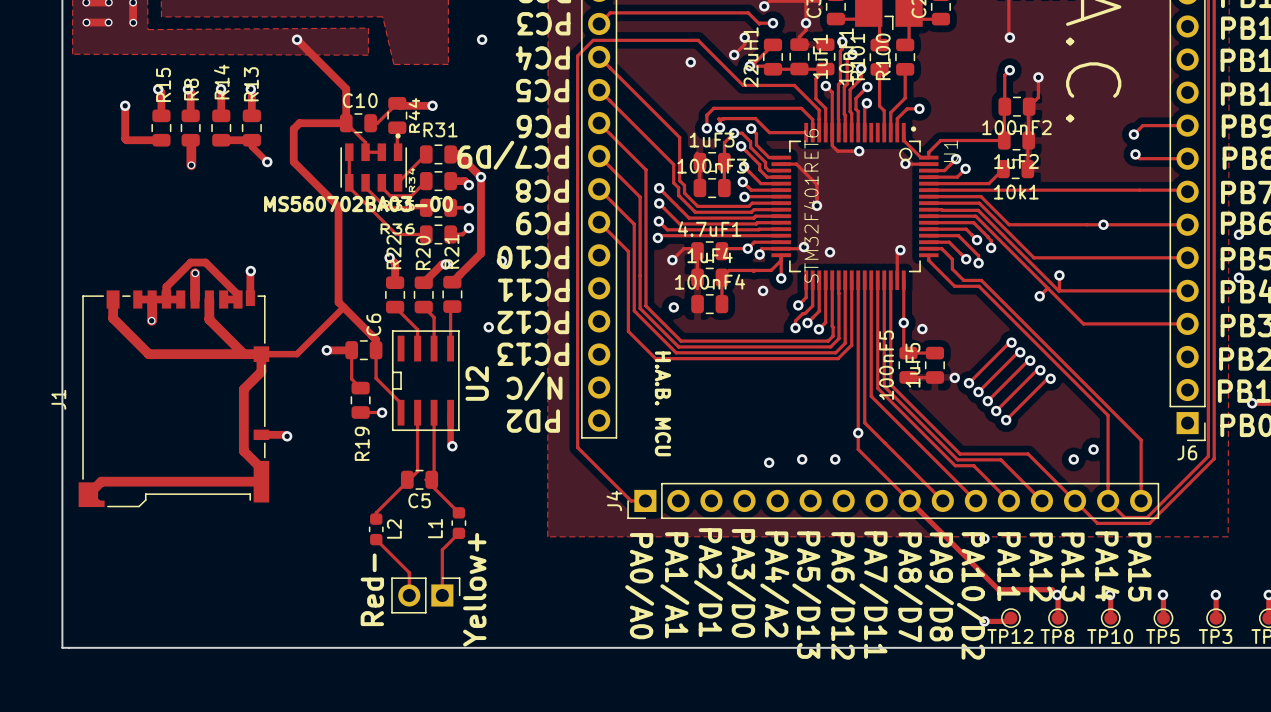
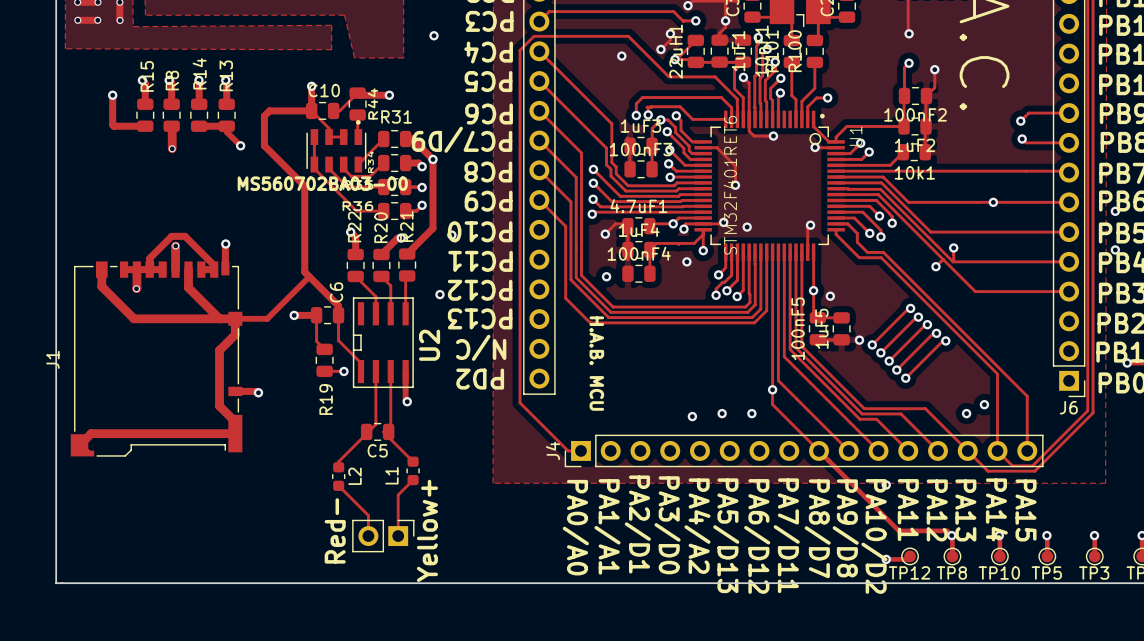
track: (297, 39) (346, 88) (346, 95) -> none
via position: (297, 39) -> (311, 86)

